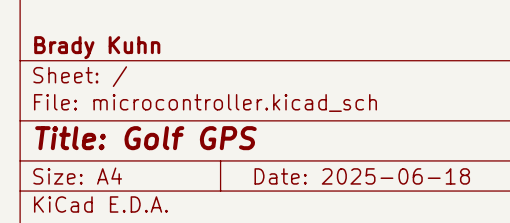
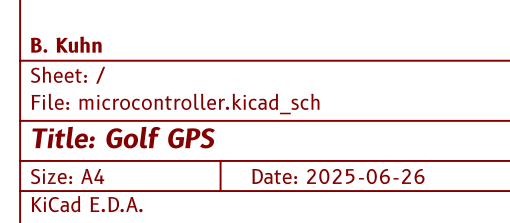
title block: Brady Kuhn (97, 47) -> B. Kuhn (66, 44)
title block: Date: 2025-06-18 (362, 176) -> Date: 2025-06-26 (338, 176)

